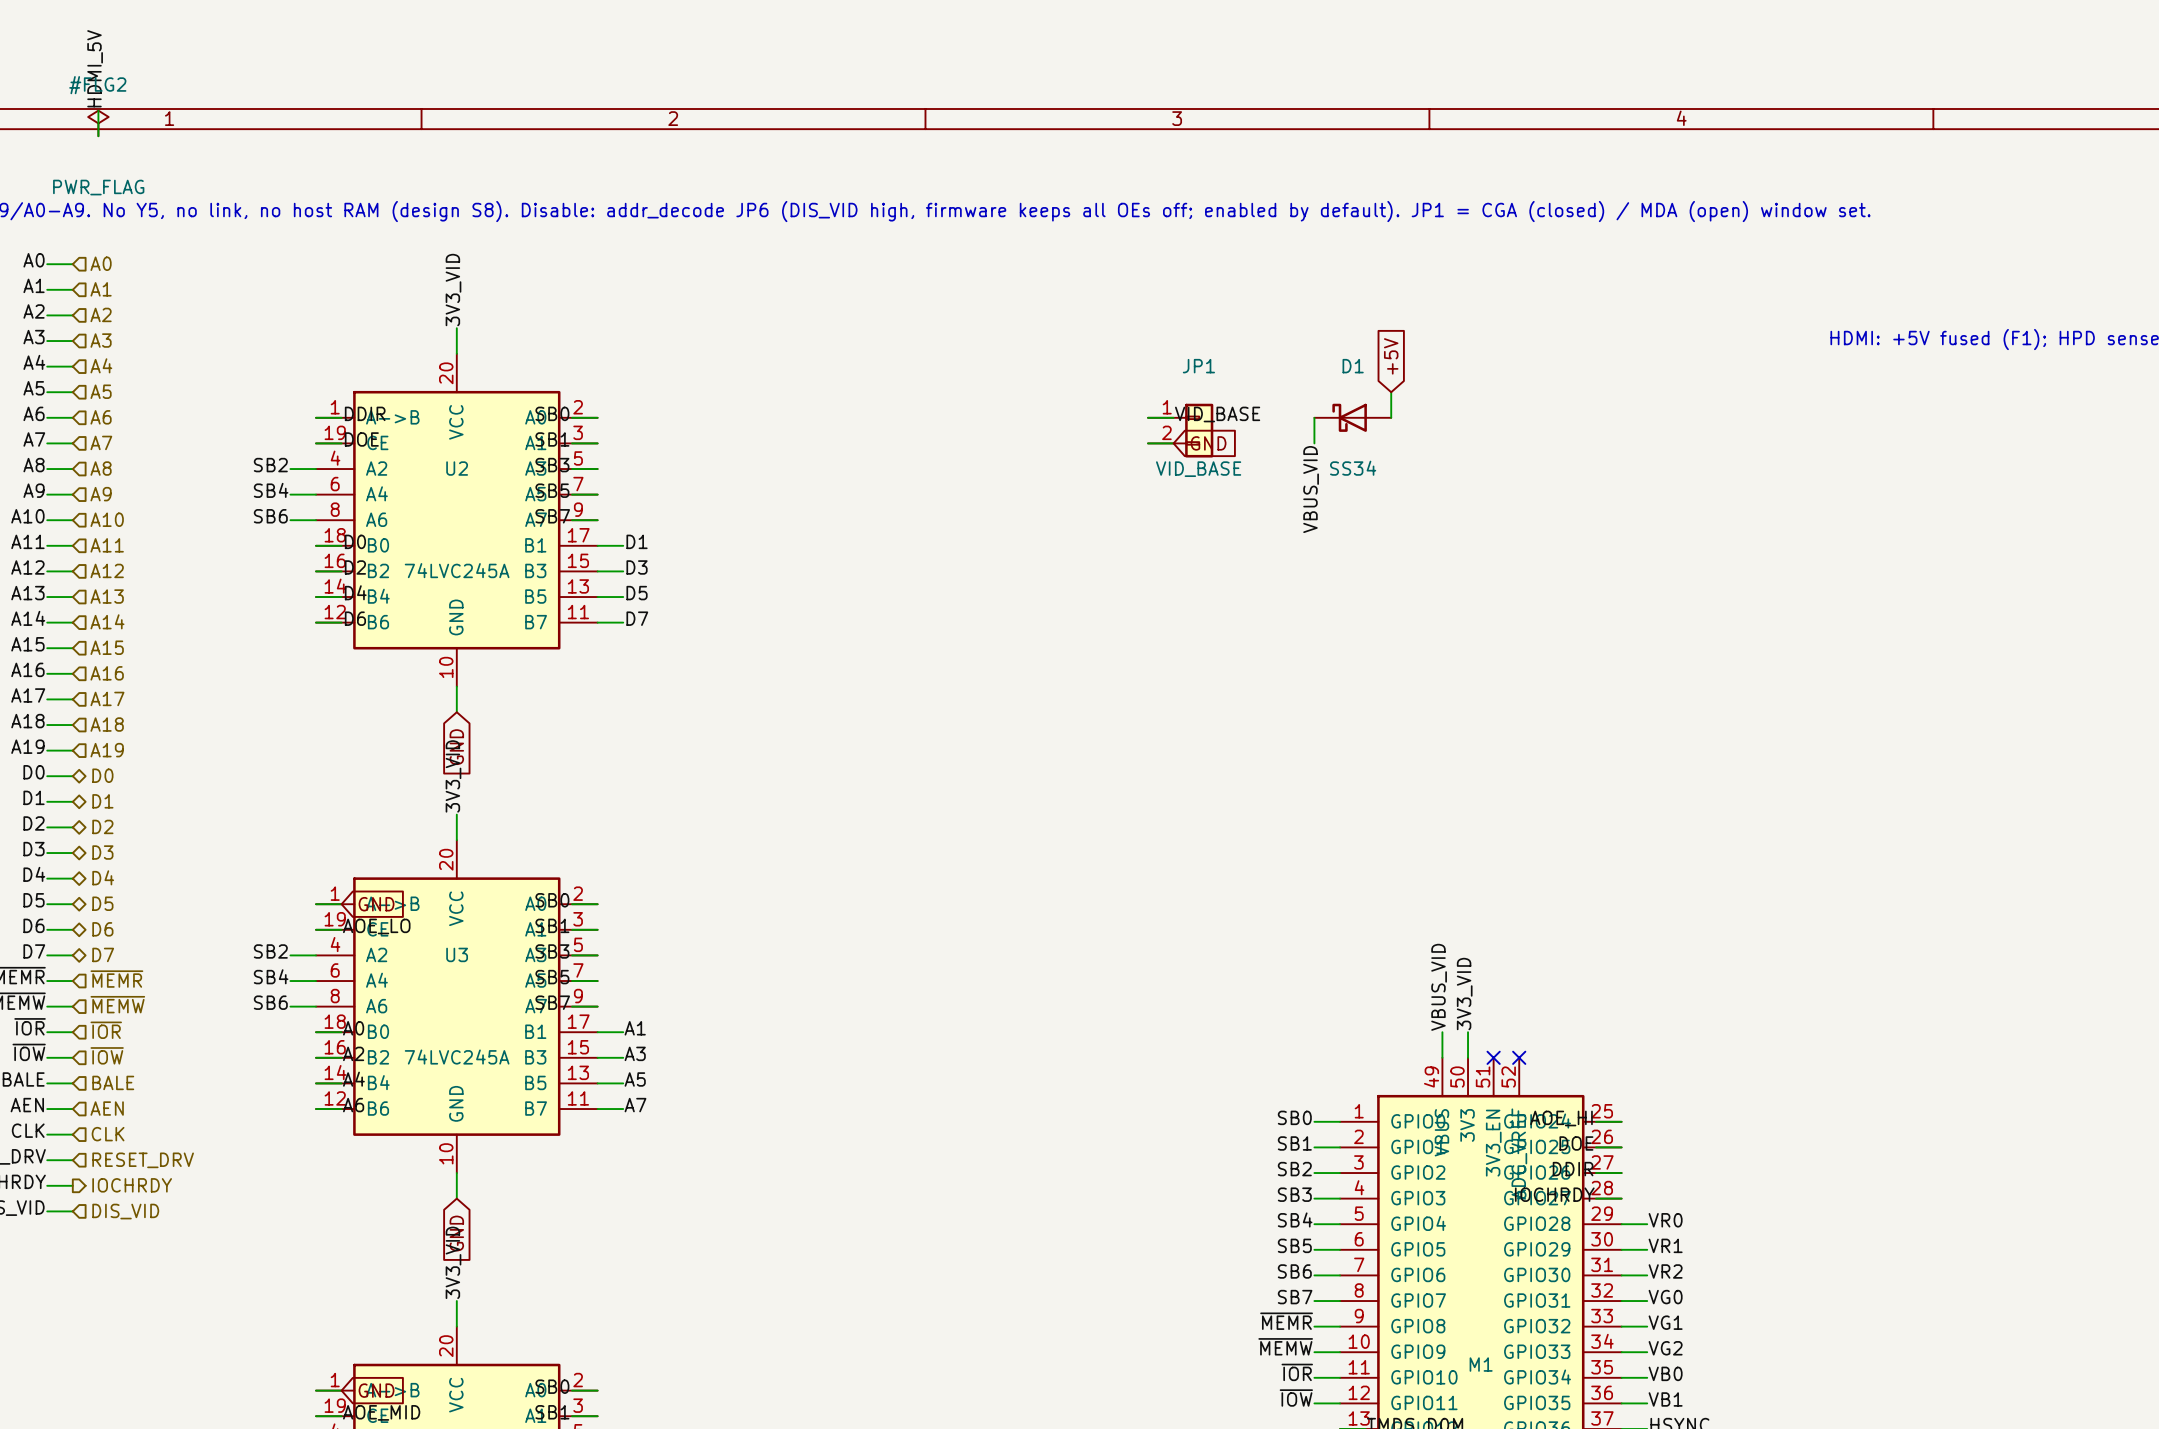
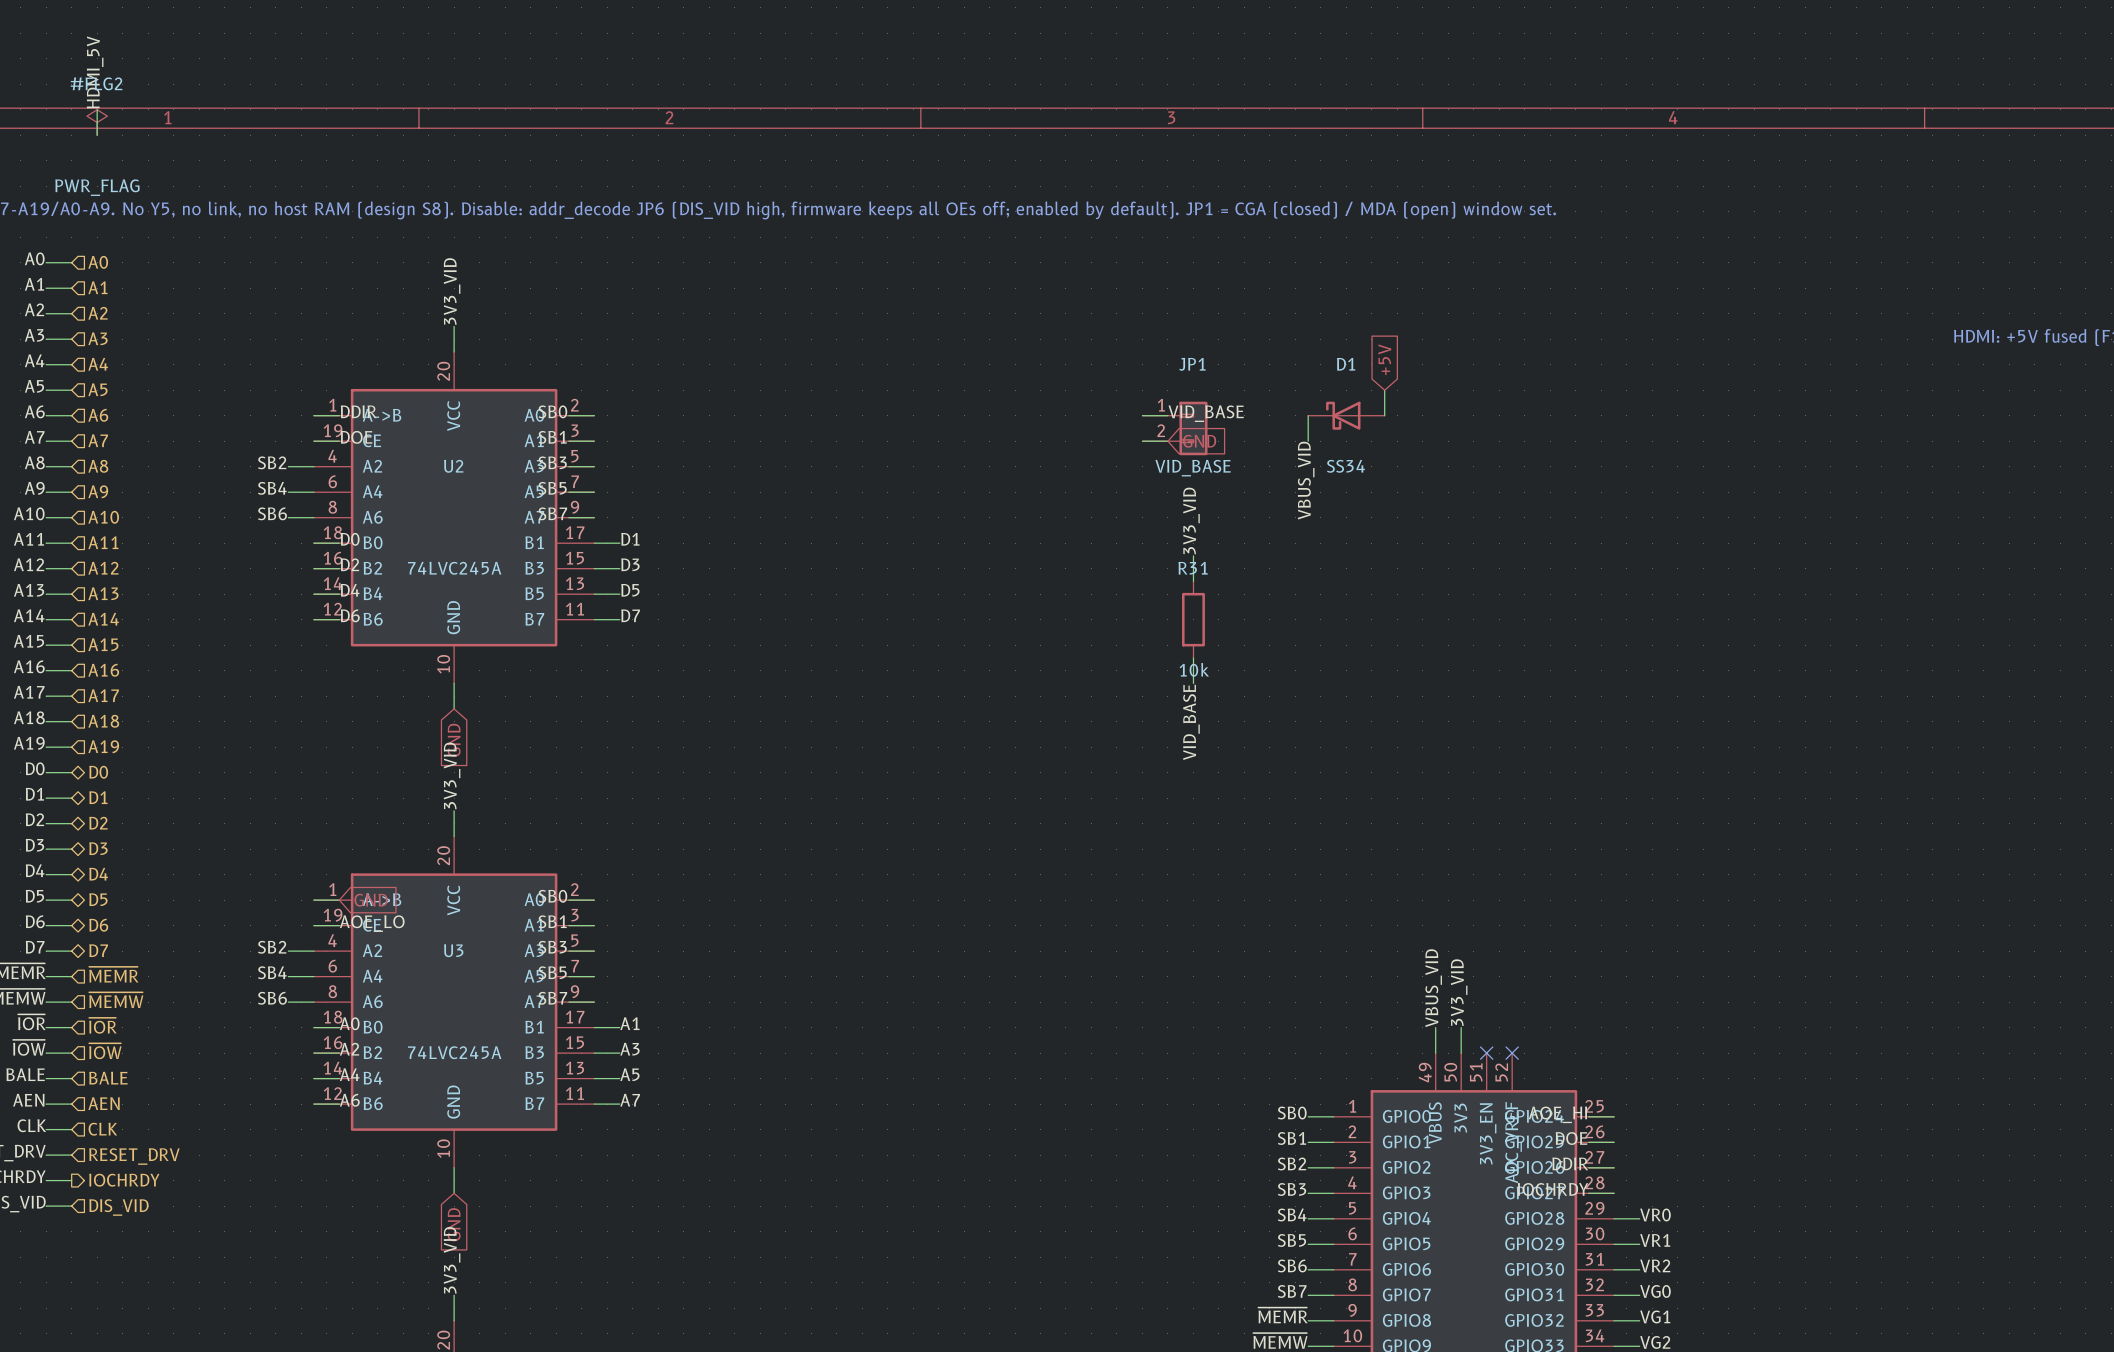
label: none -> 3V3_VID (1191, 520)
wire: none -> (1193, 555) (1193, 581)
R31: none -> 10k (1193, 619)
wire: none -> (1193, 657) (1193, 683)
label: none -> VID_BASE (1191, 722)

